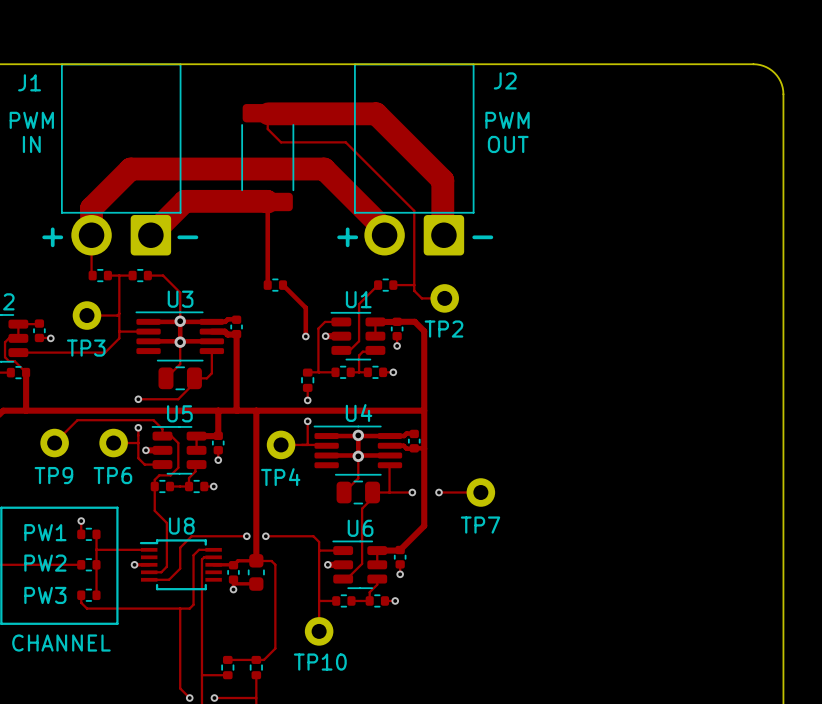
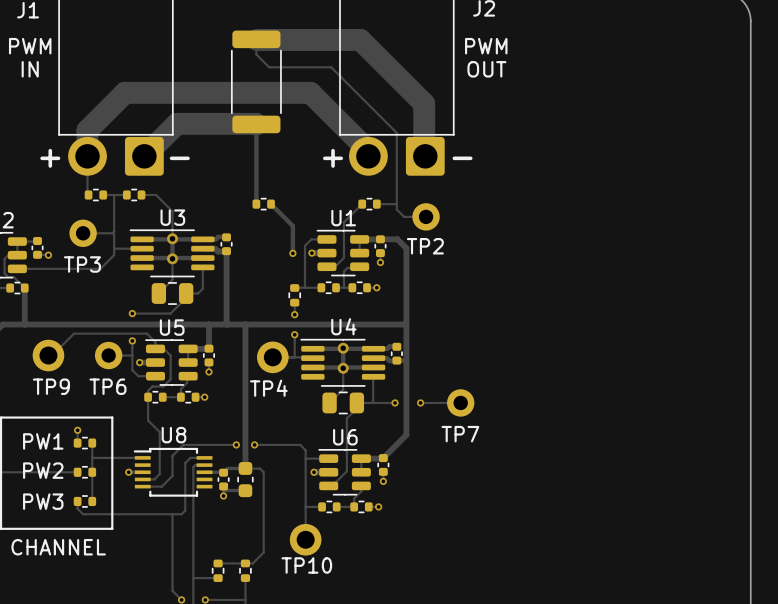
part footprint: [40, 428, 69, 458] -> [32, 339, 65, 372]
part footprint: [266, 430, 296, 460] -> [257, 341, 289, 374]
part footprint: [304, 617, 334, 646] -> [289, 523, 322, 556]

